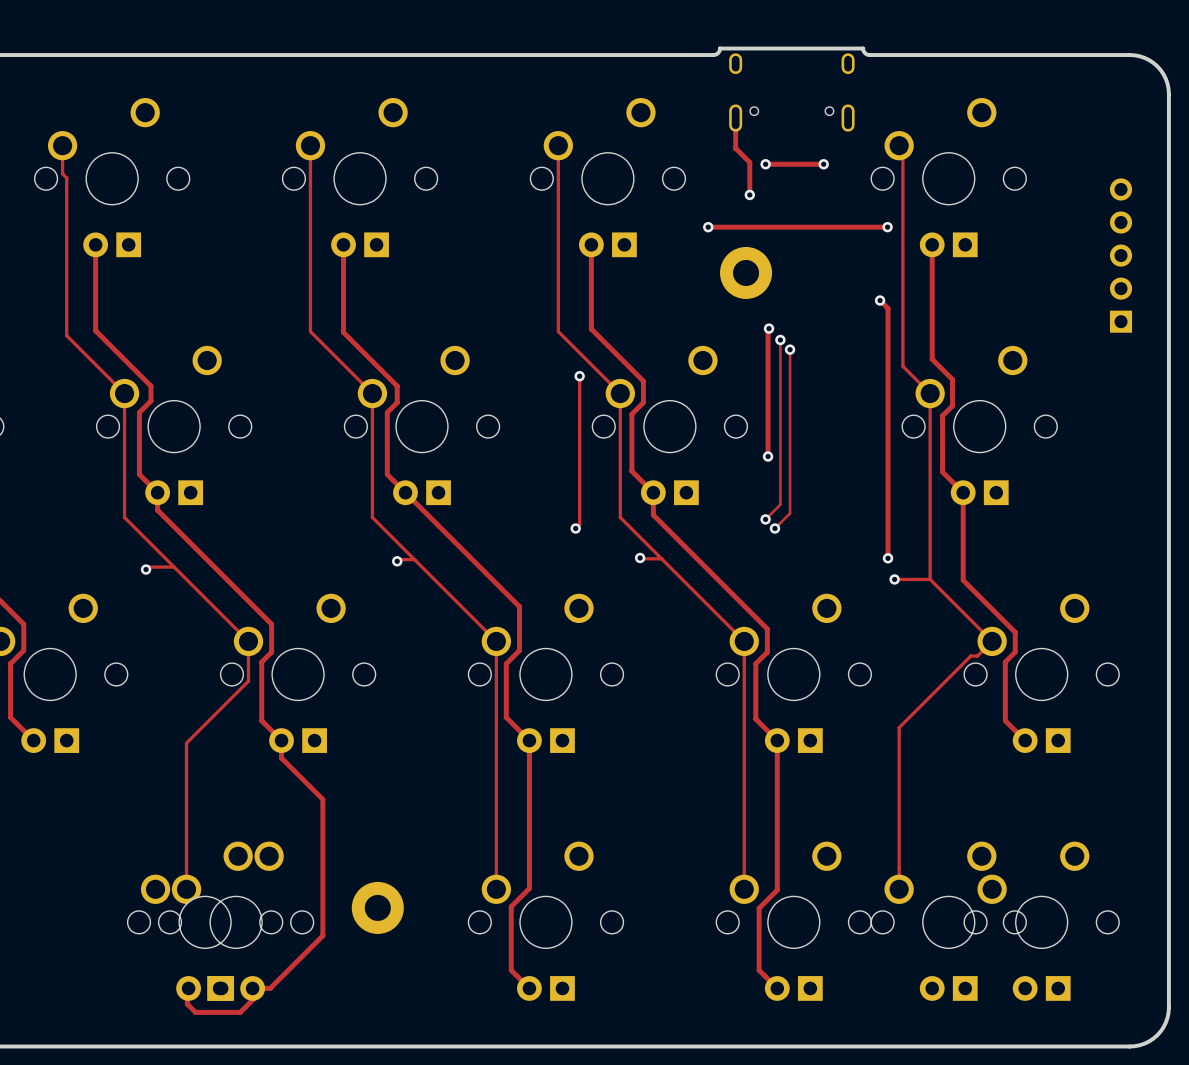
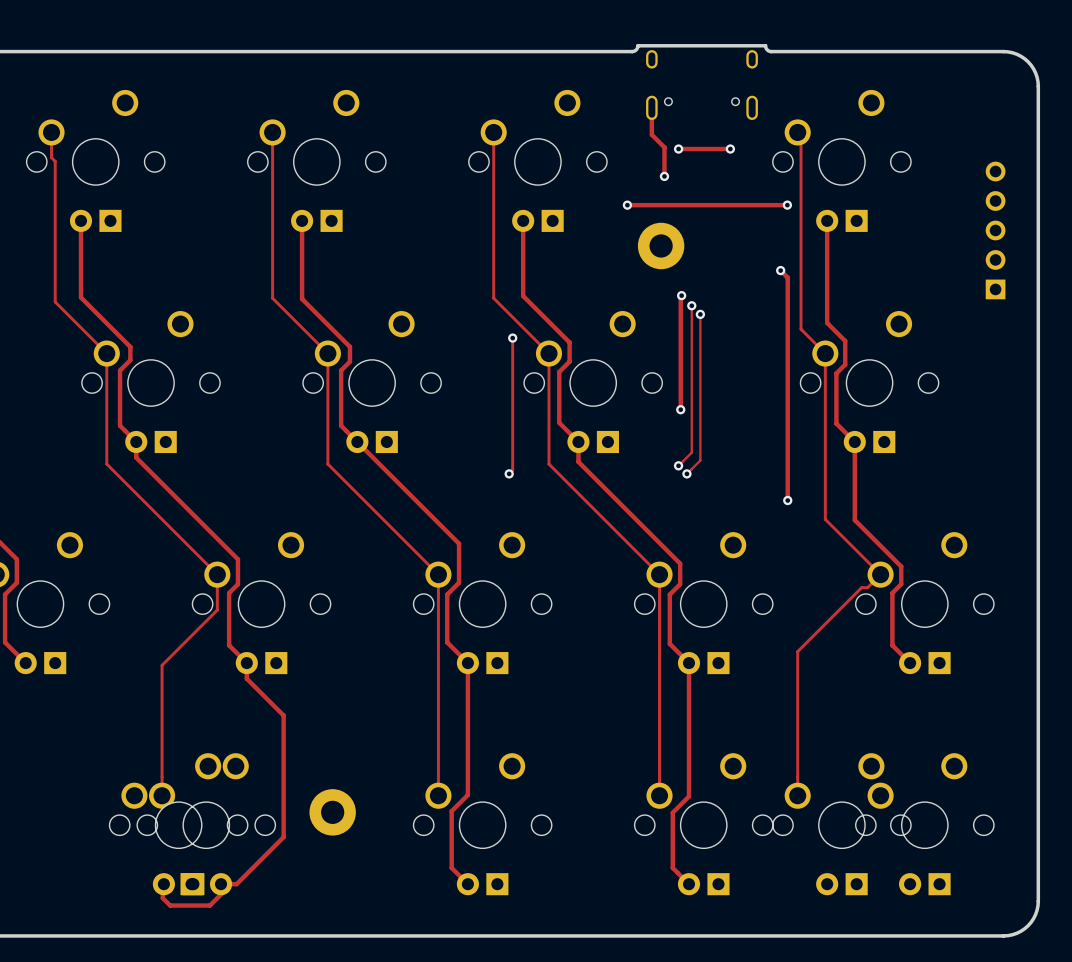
track: (640, 557) (661, 558) -> none
via: (640, 557) -> none
track: (414, 559) (397, 561) -> none
via: (397, 561) -> none
track: (174, 567) (148, 567) (146, 569) -> none
via: (146, 569) -> none
track: (894, 579) (930, 579) -> none
via: (894, 579) -> none

